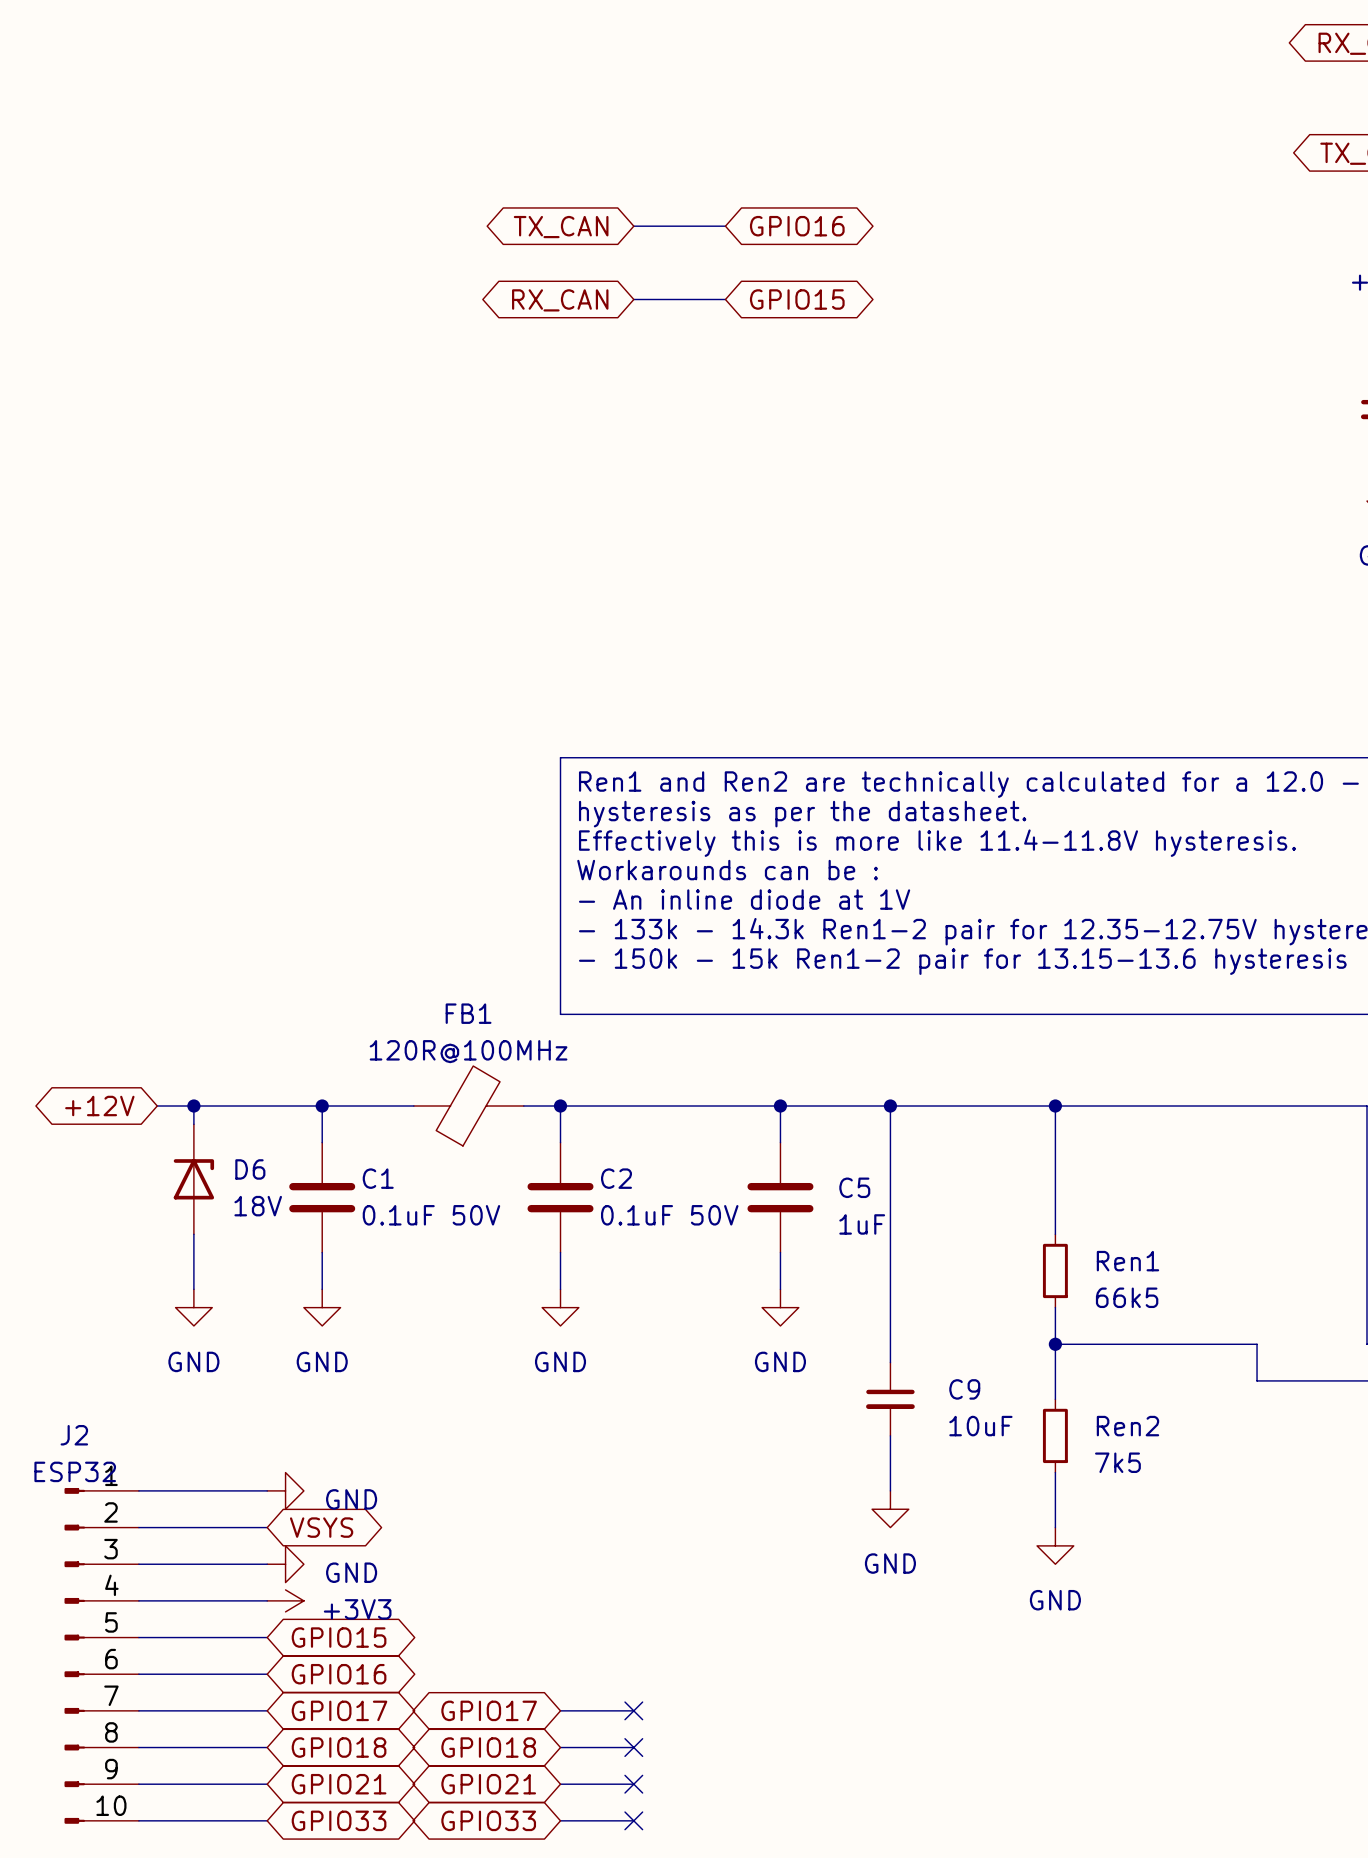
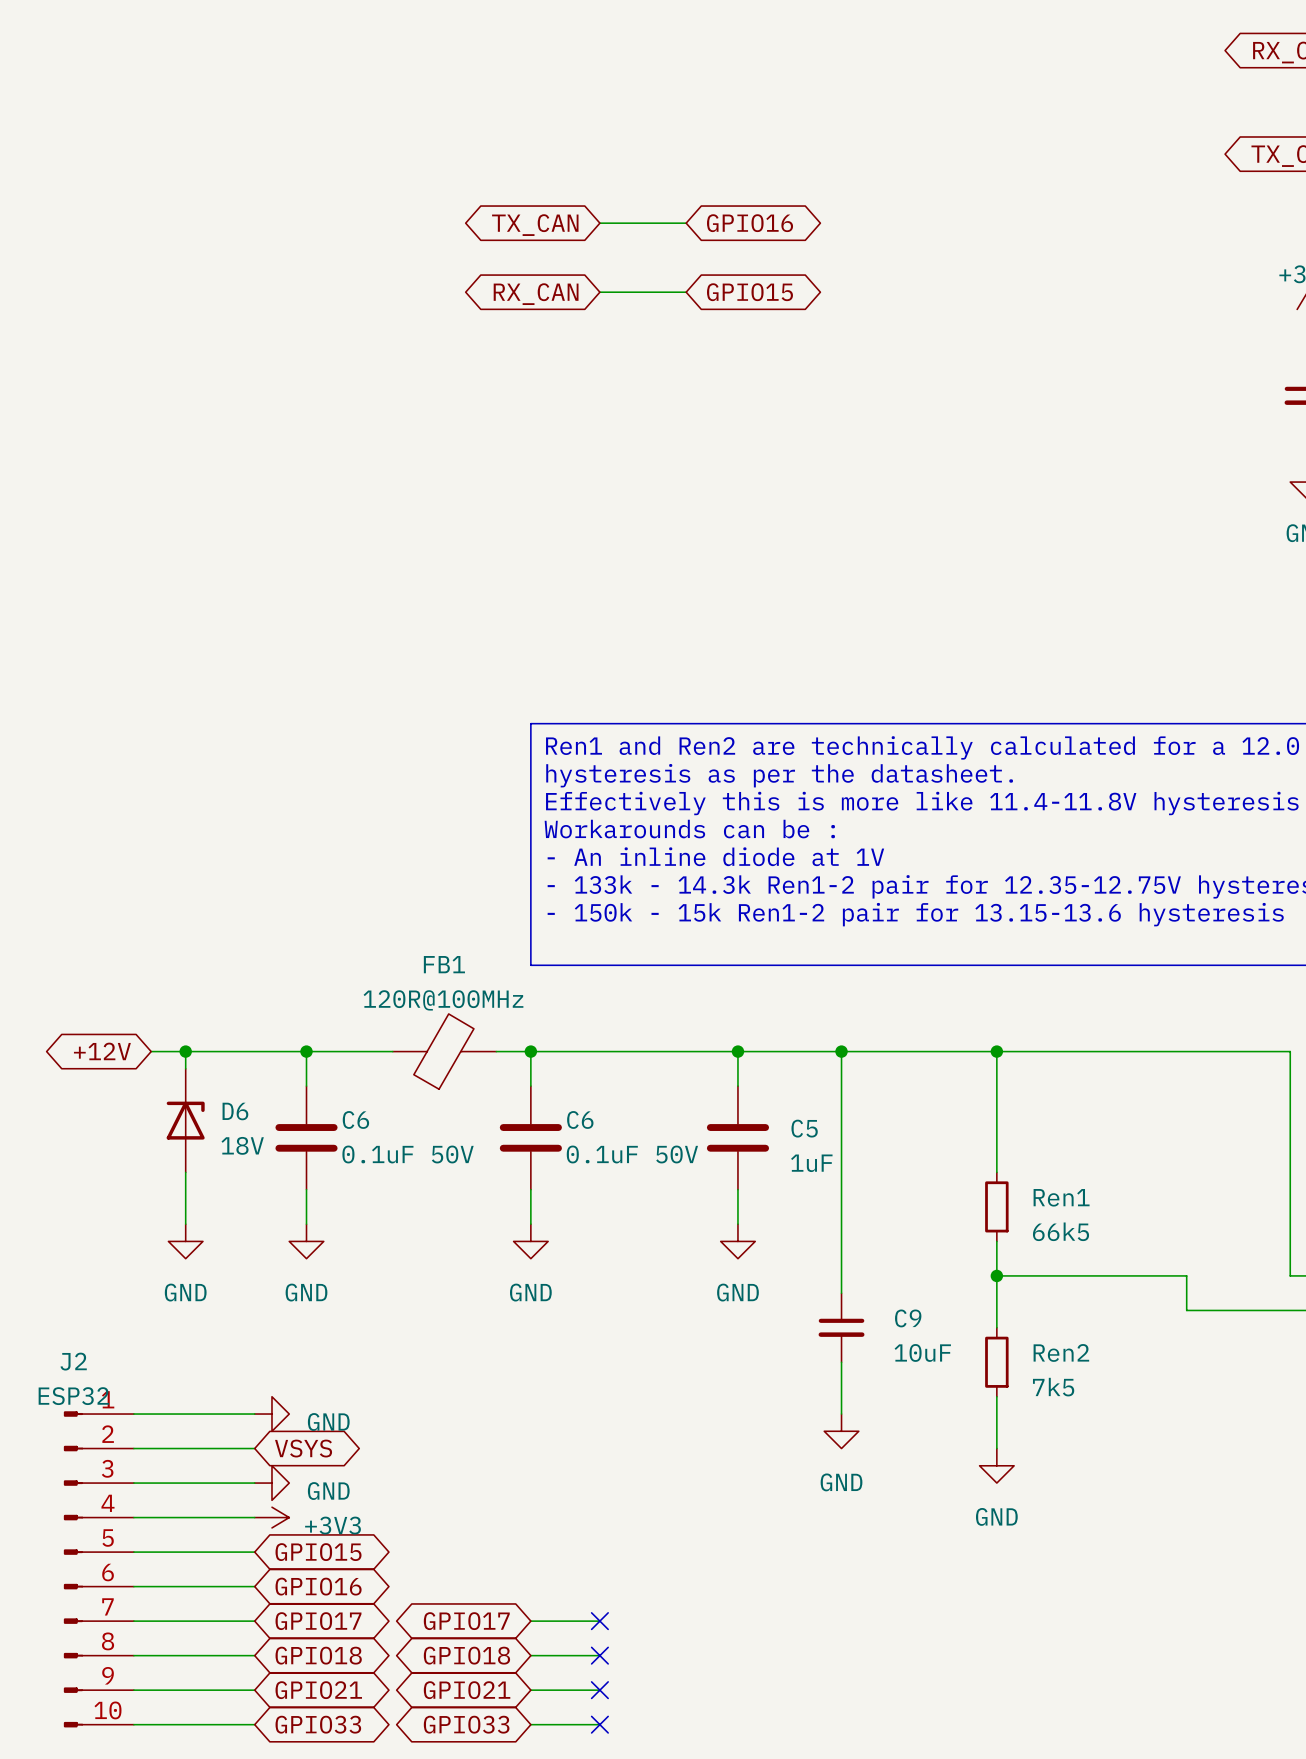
C1 name: C1 (378, 1178) -> C6 (355, 1119)
C2 name: C2 (616, 1178) -> C6 (580, 1119)

